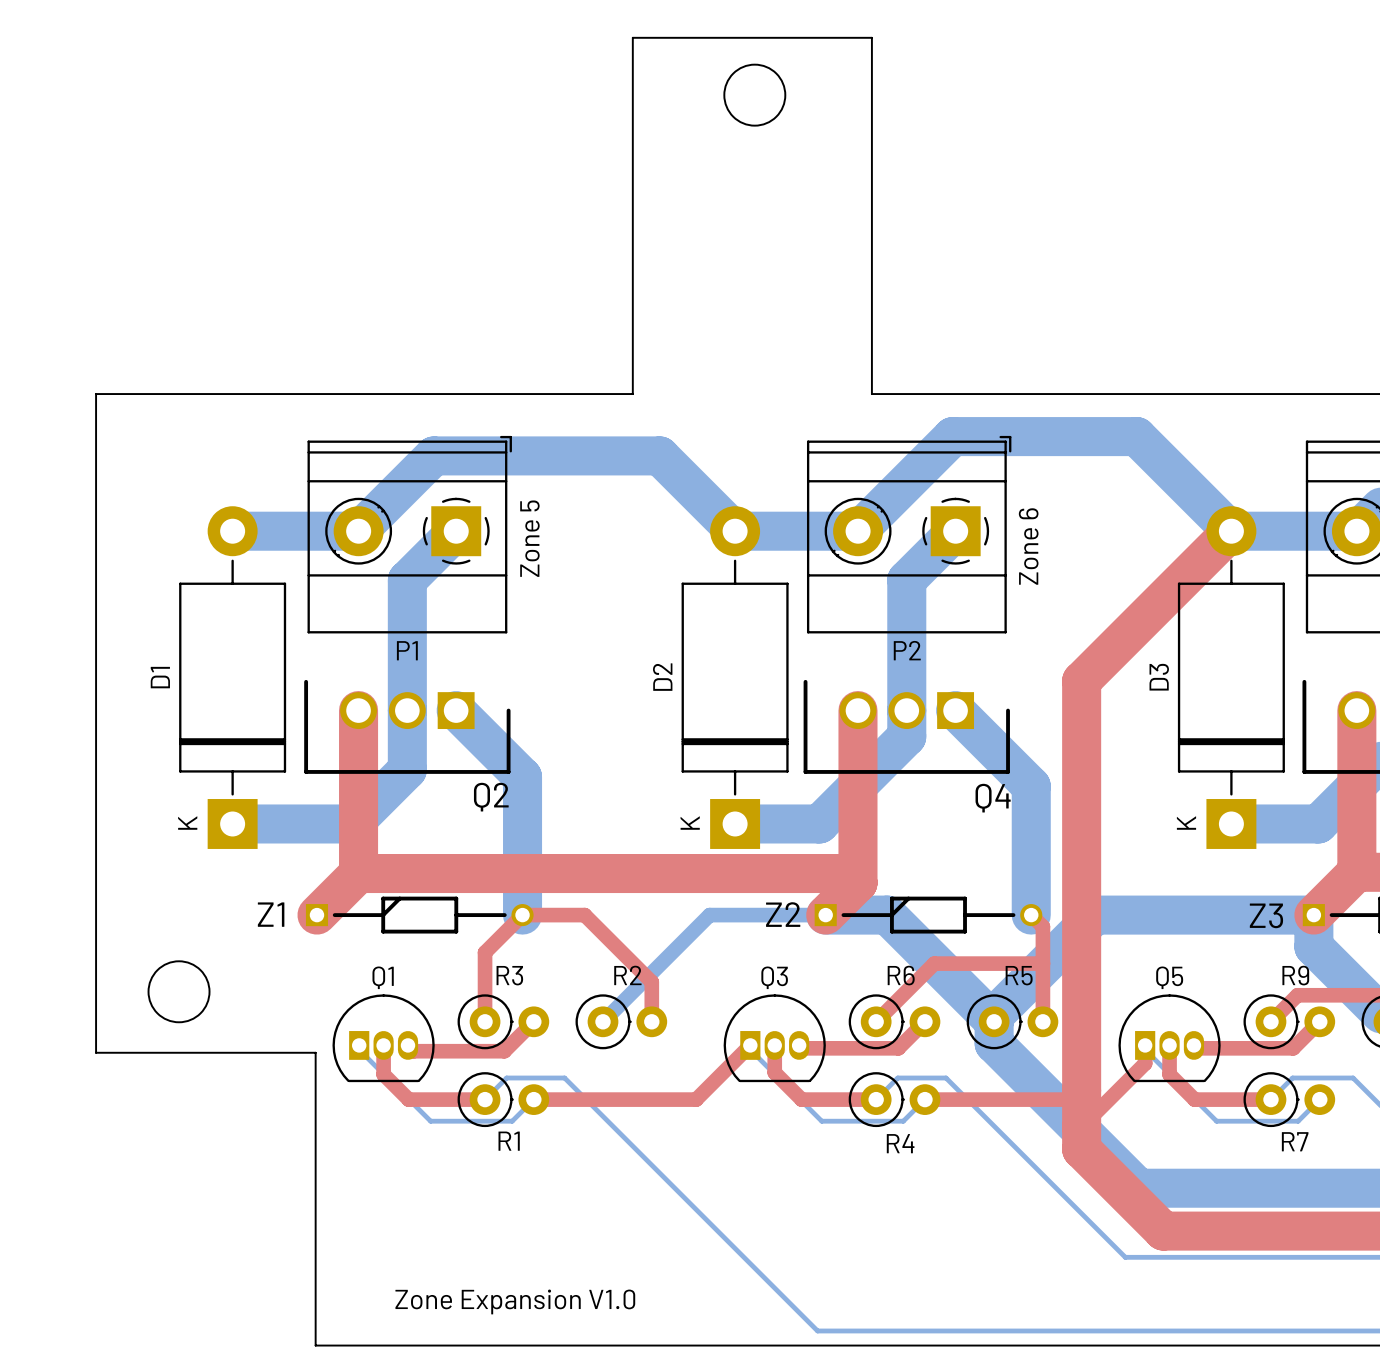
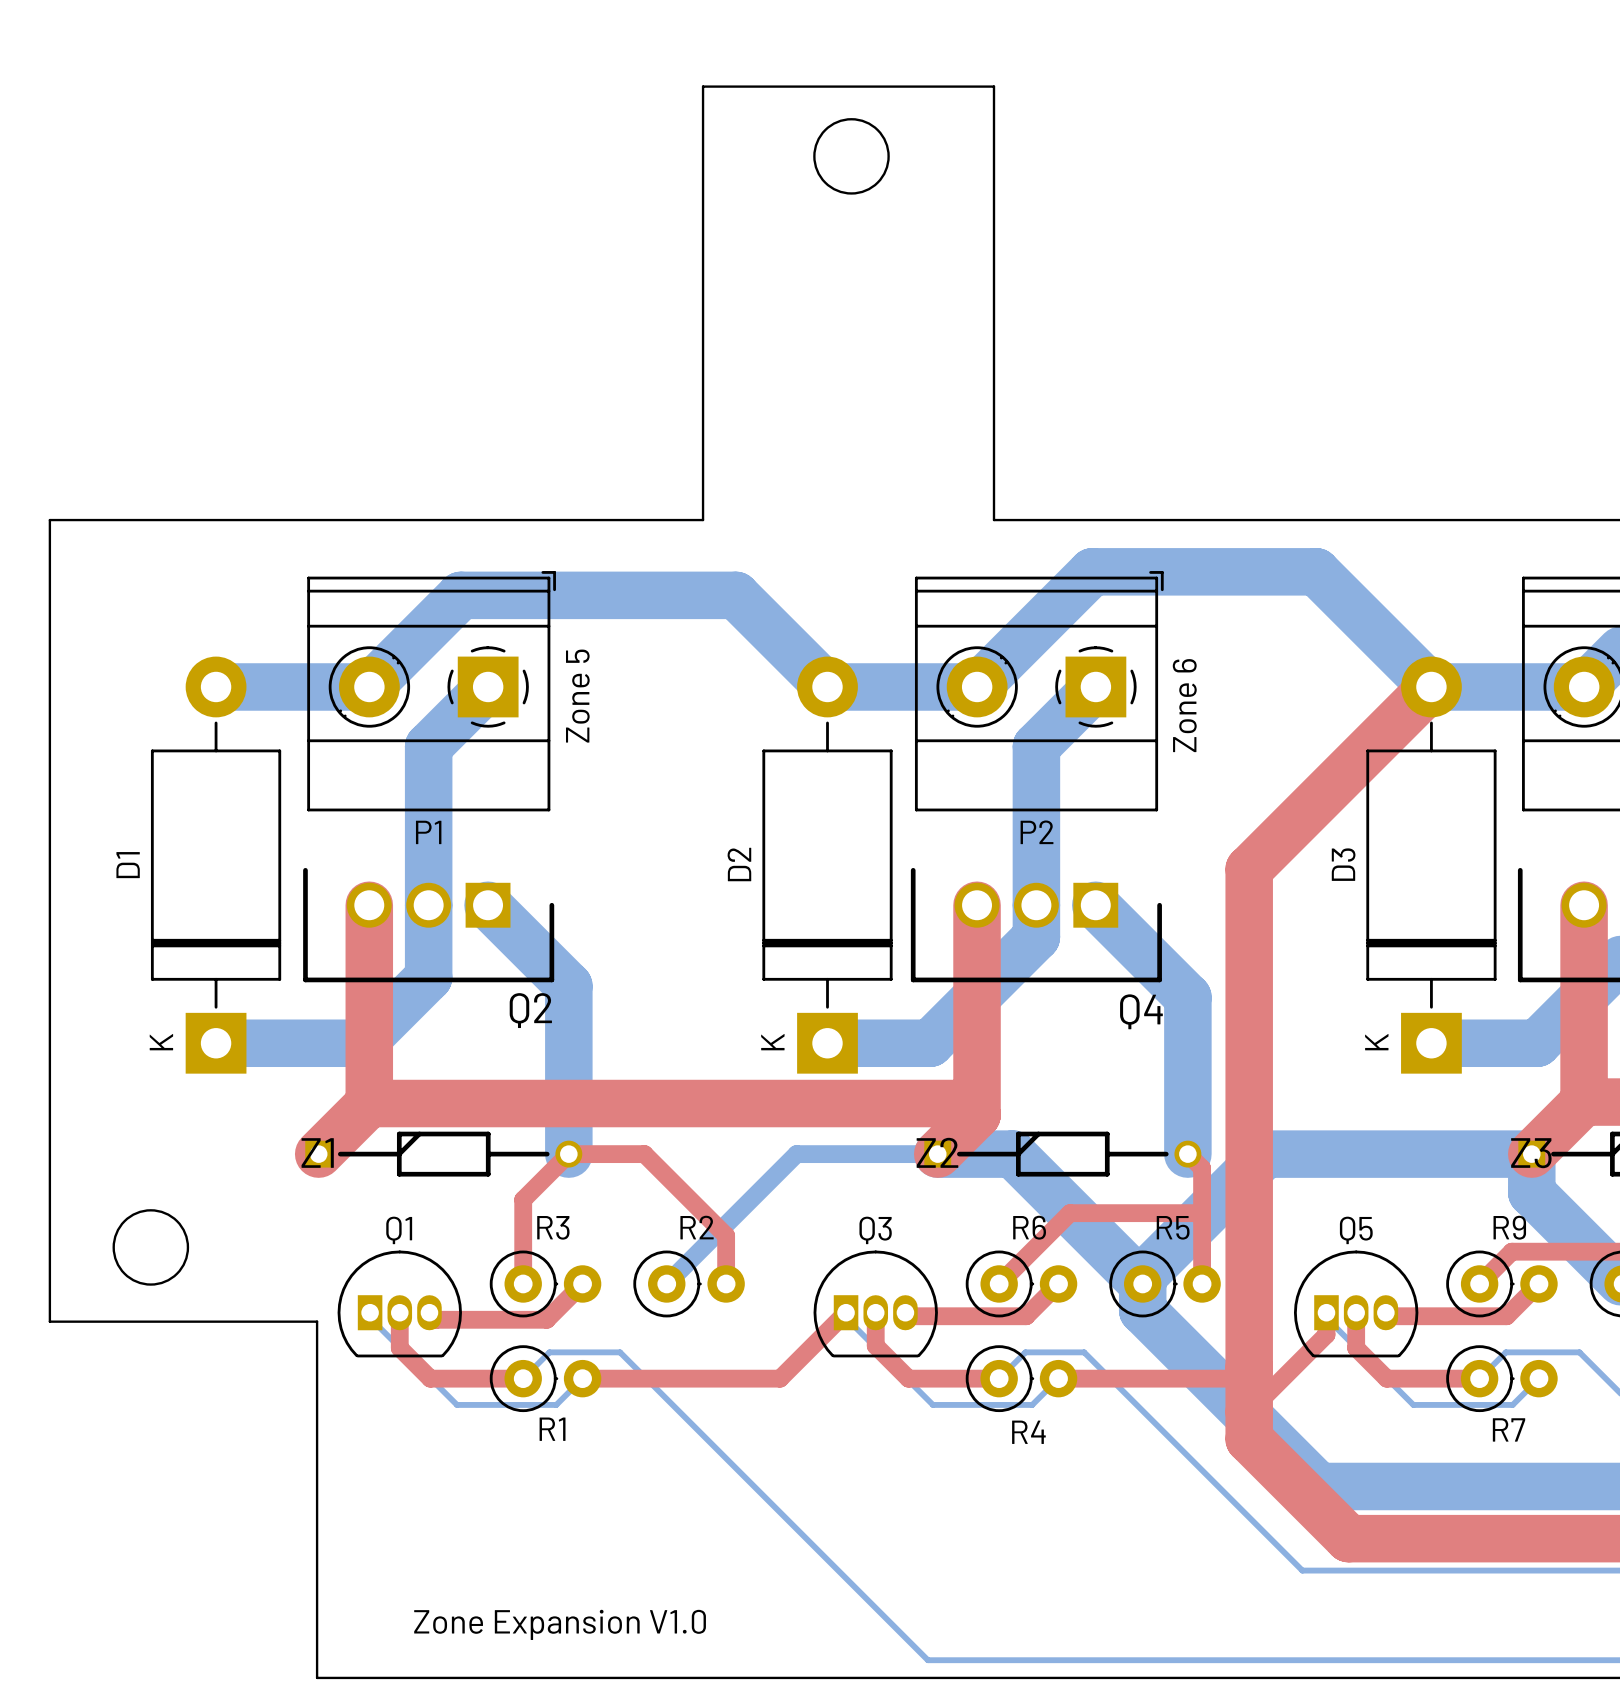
Z1 name position: Z1 (271, 914) -> Z1 (317, 1153)
Z2 name position: Z2 (783, 914) -> Z2 (937, 1152)
Z3 name position: Z3 (1266, 915) -> Z3 (1531, 1153)

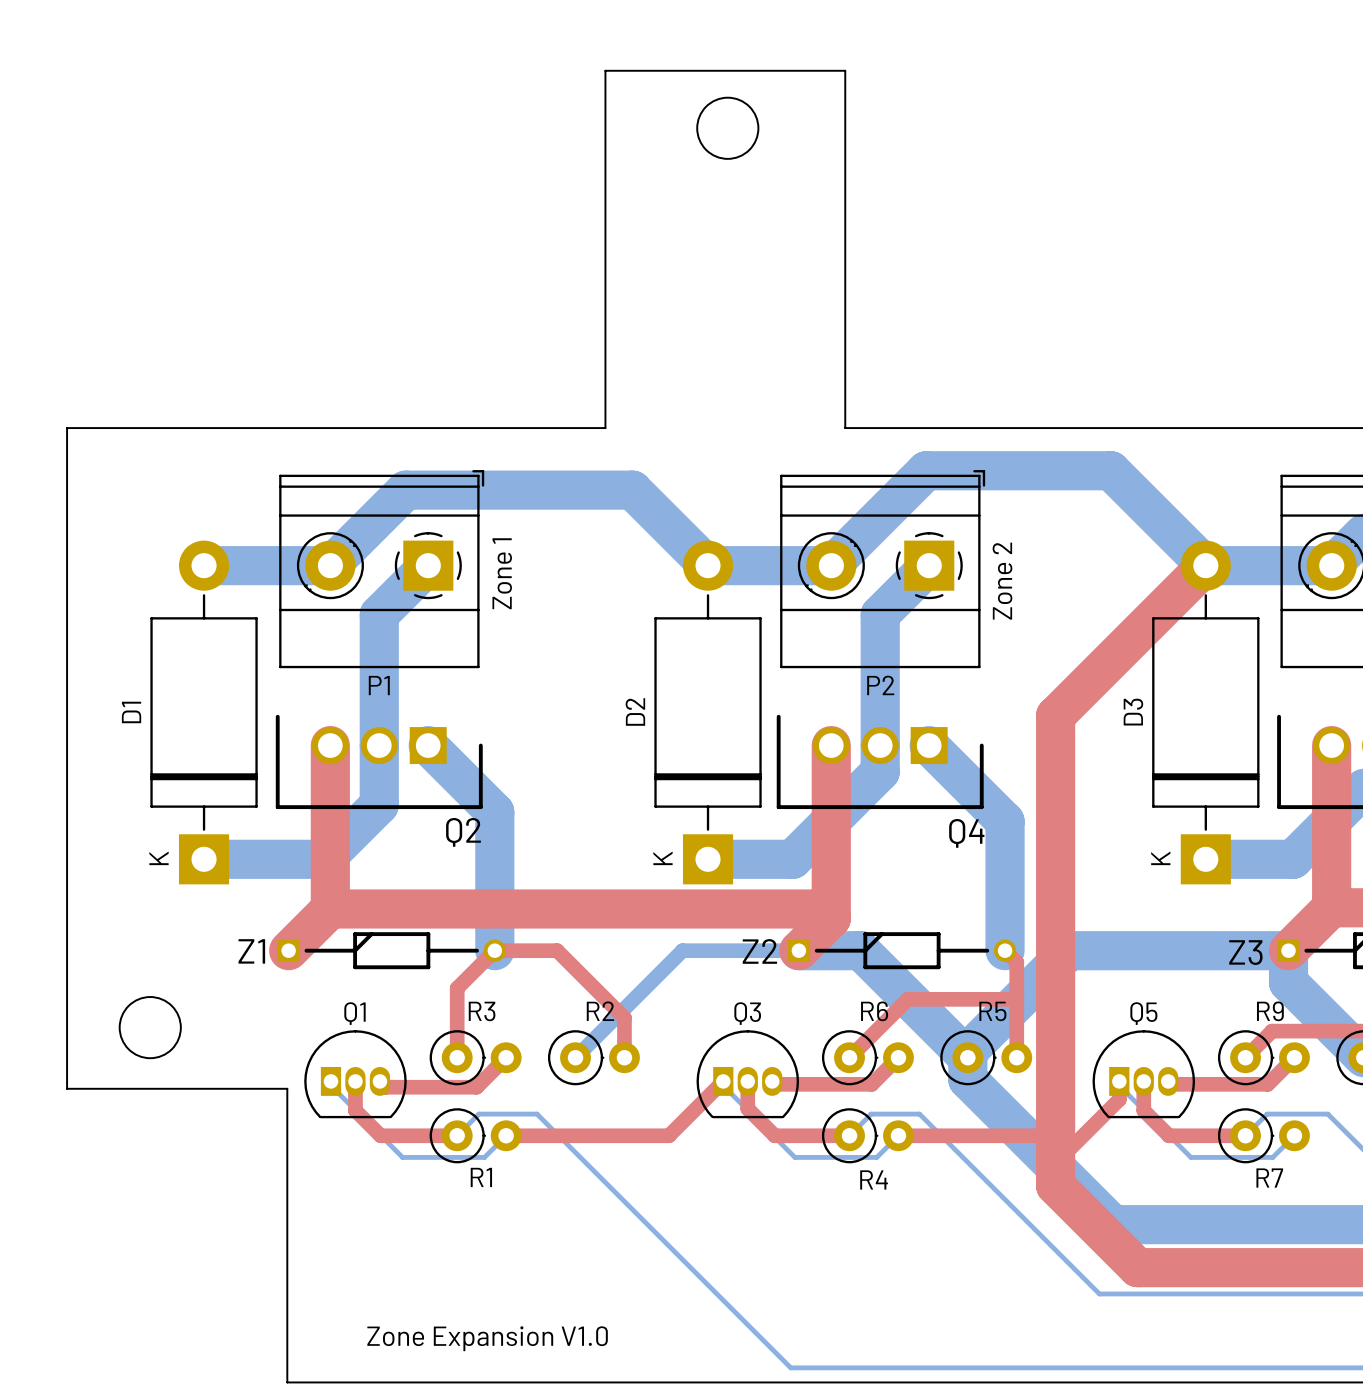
text: Zone 5 (577, 696) -> Zone 1 (502, 573)
text: Zone 6 (1184, 705) -> Zone 2 (1002, 581)
Z2 name position: Z2 (937, 1152) -> Z2 (759, 951)
Z1 name position: Z1 (317, 1153) -> Z1 (251, 951)
Z3 name position: Z3 (1531, 1153) -> Z3 (1245, 952)

